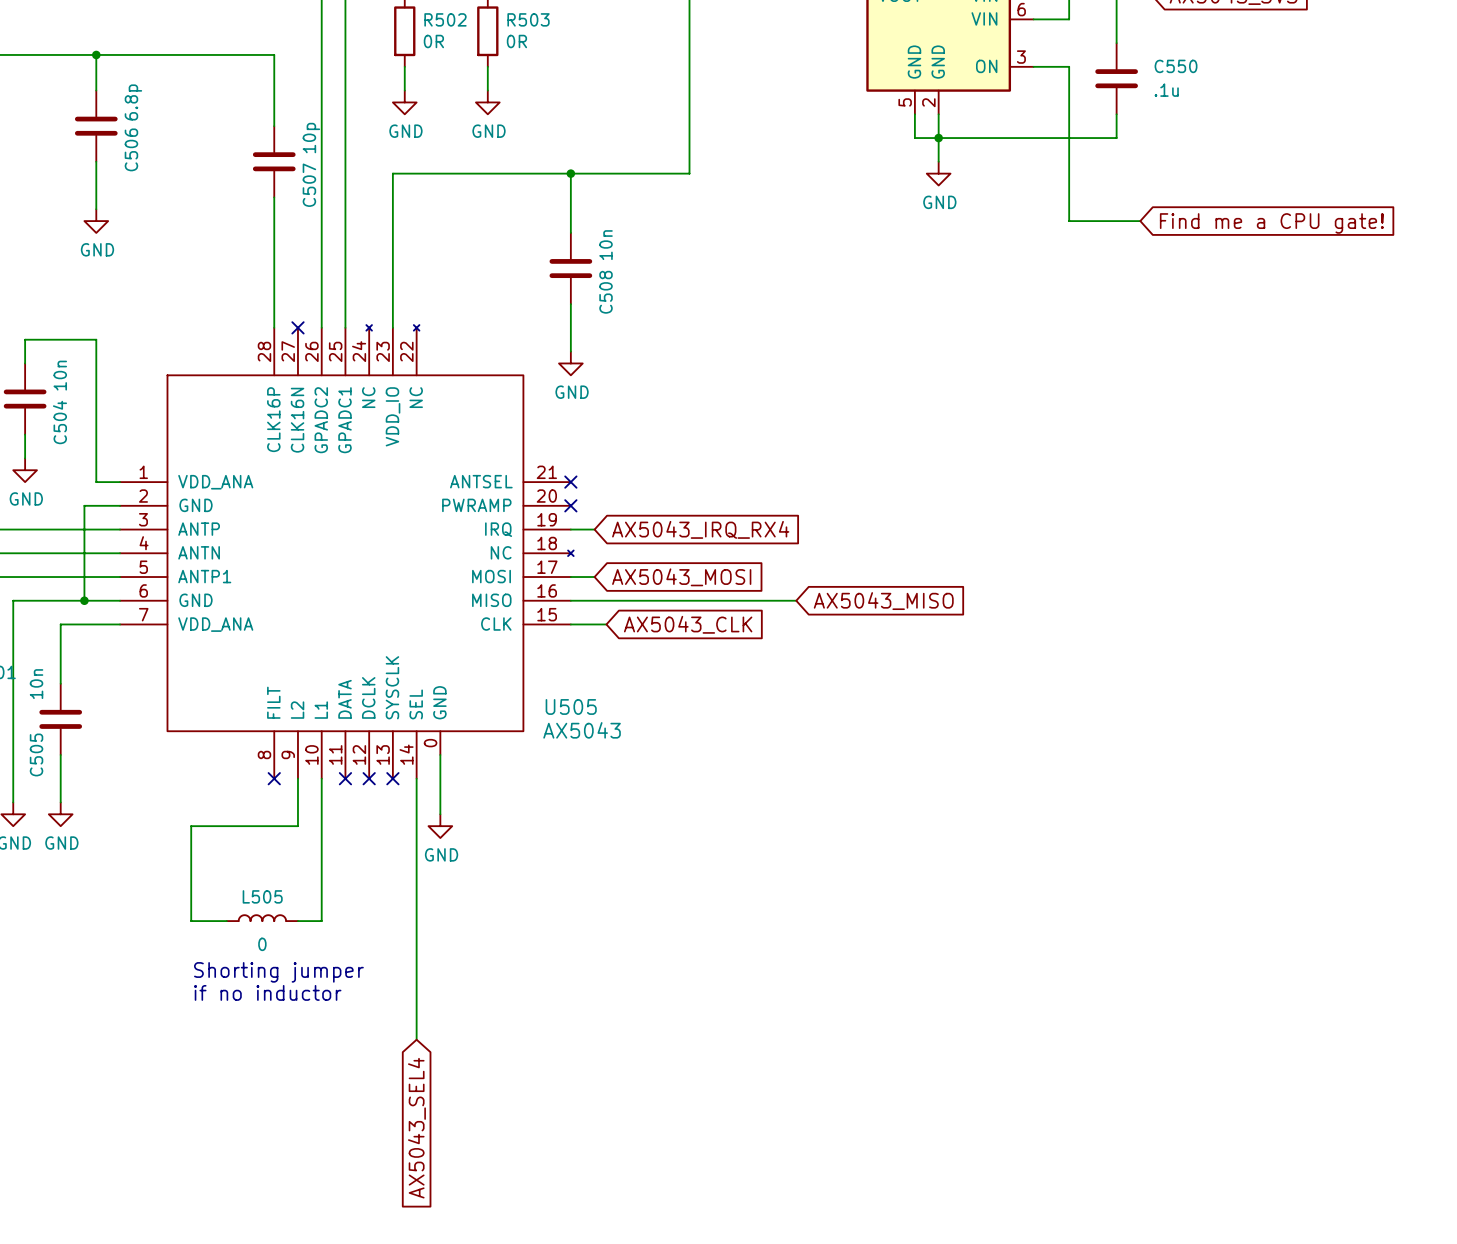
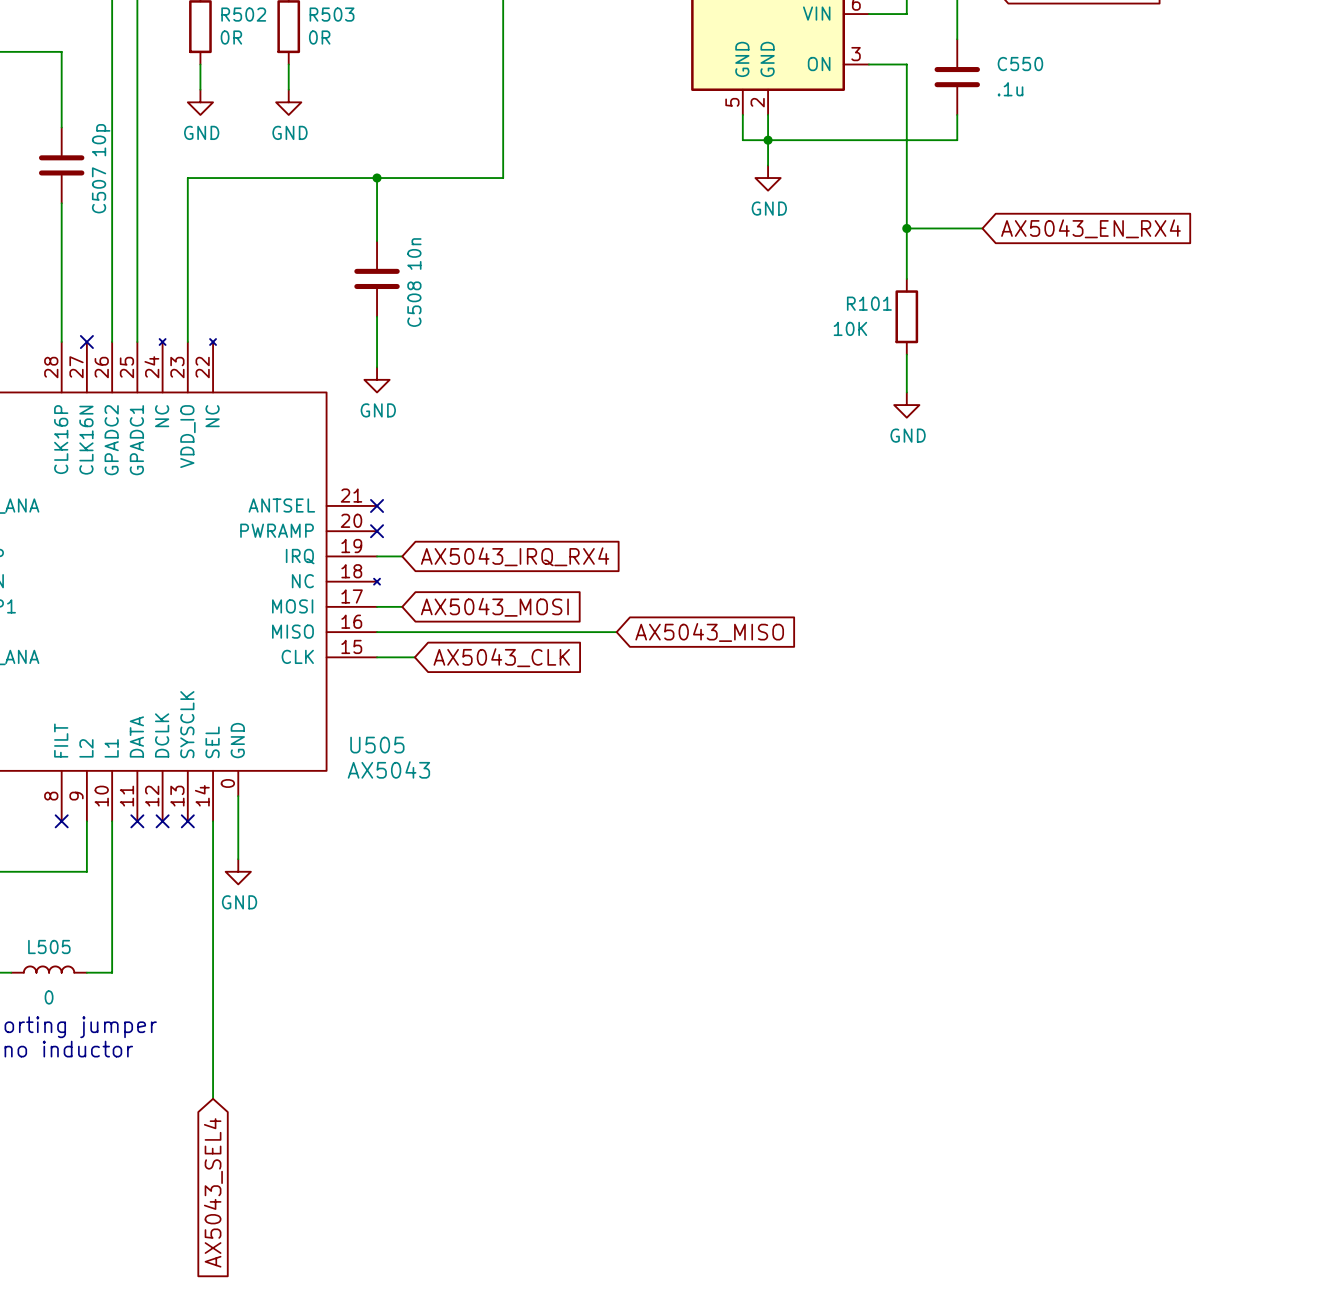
wire: none -> (906, 228) (906, 278)
junction: none -> (906, 228)
global label: Find me a CPU gate! (1271, 223) -> AX5043_EN_RX4 (1090, 228)
R101: none -> 10K (906, 316)
wire: none -> (906, 354) (906, 392)
power symbol: none -> GND (906, 405)

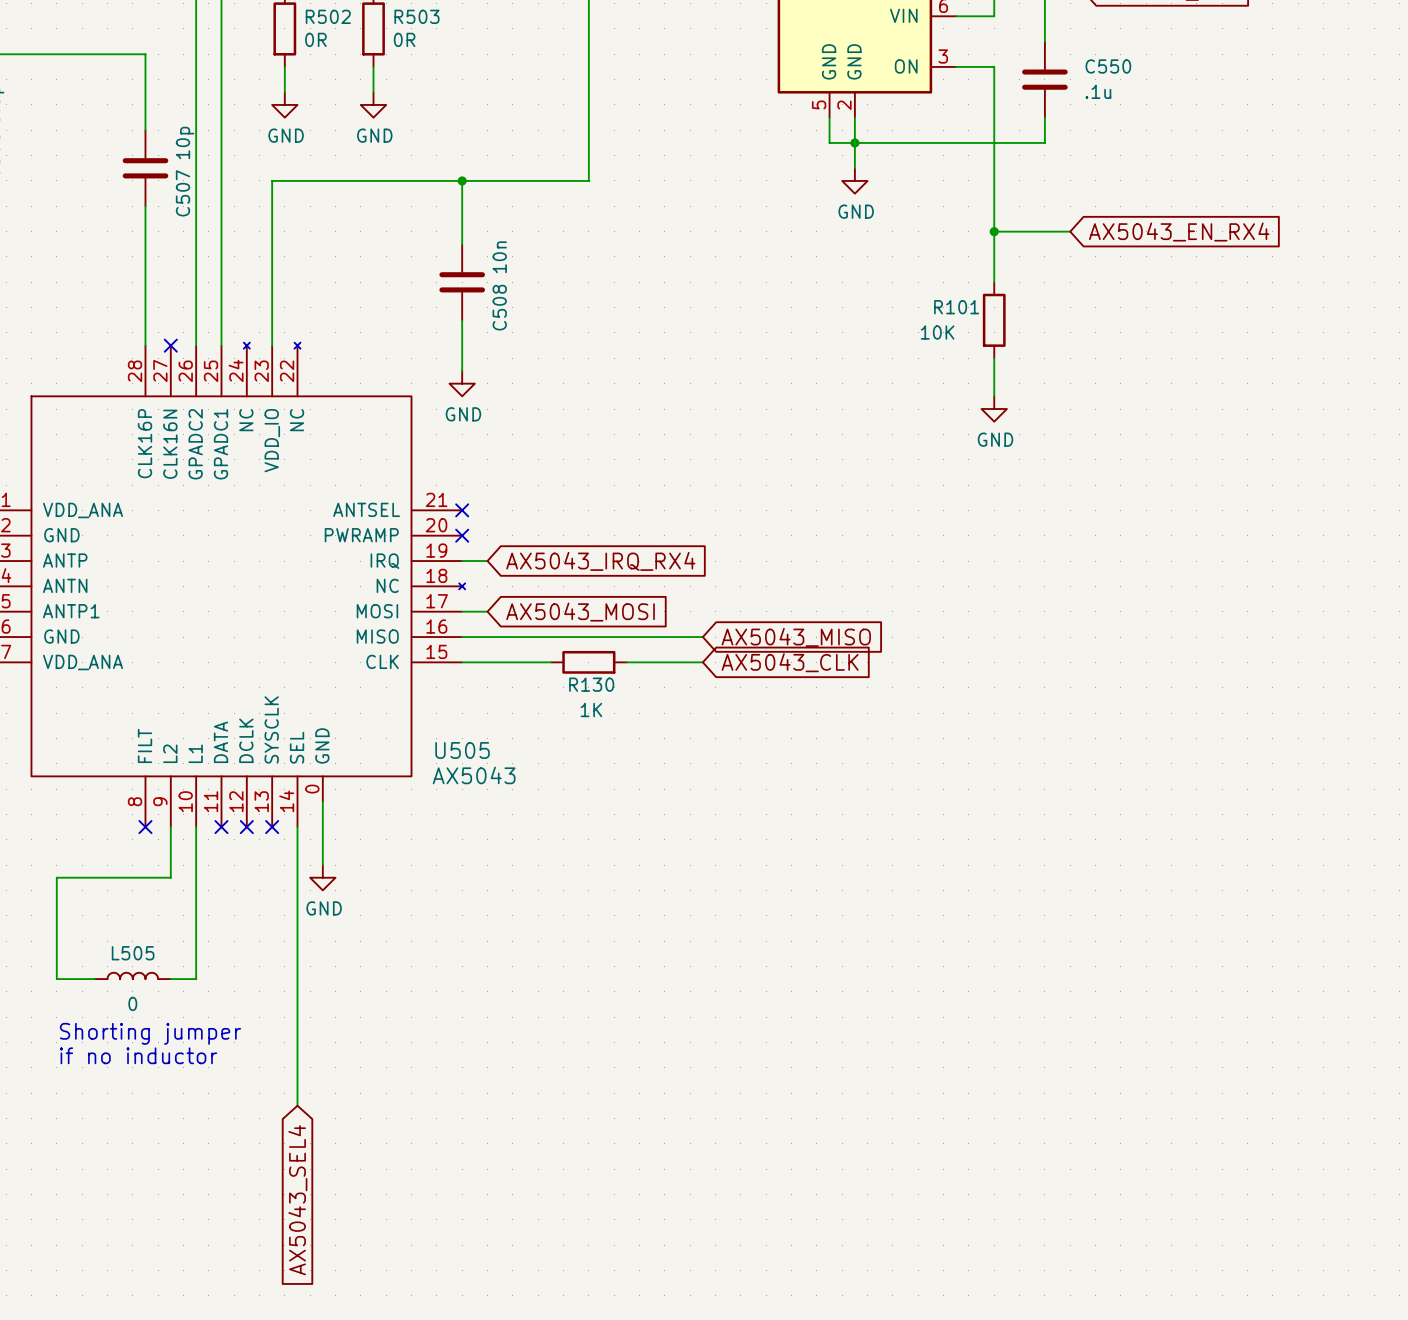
wire: none -> (500, 662) (550, 662)
global label position: AX5043_CLK (501, 657) -> AX5043_CLK (790, 662)
R130: none -> 1K (588, 662)
wire: none -> (626, 662) (702, 662)

